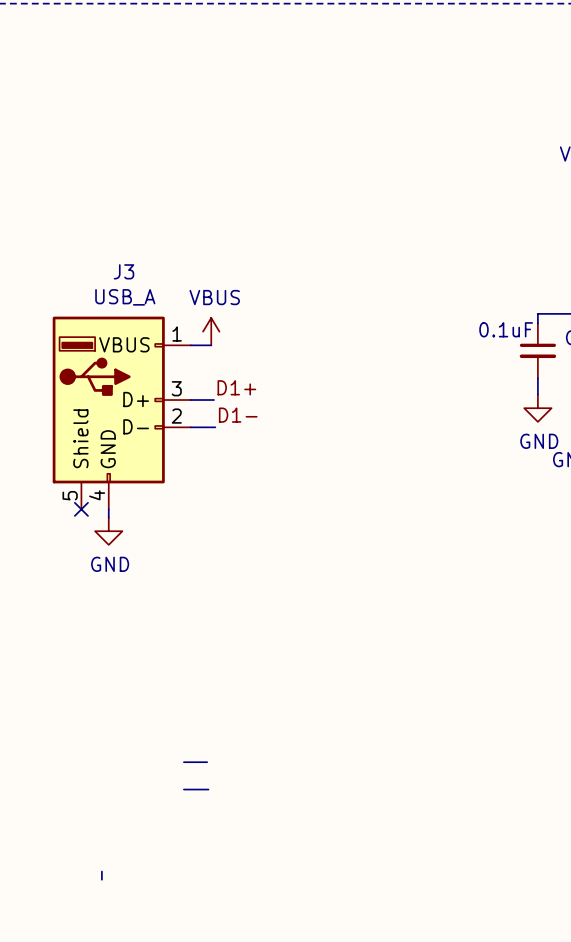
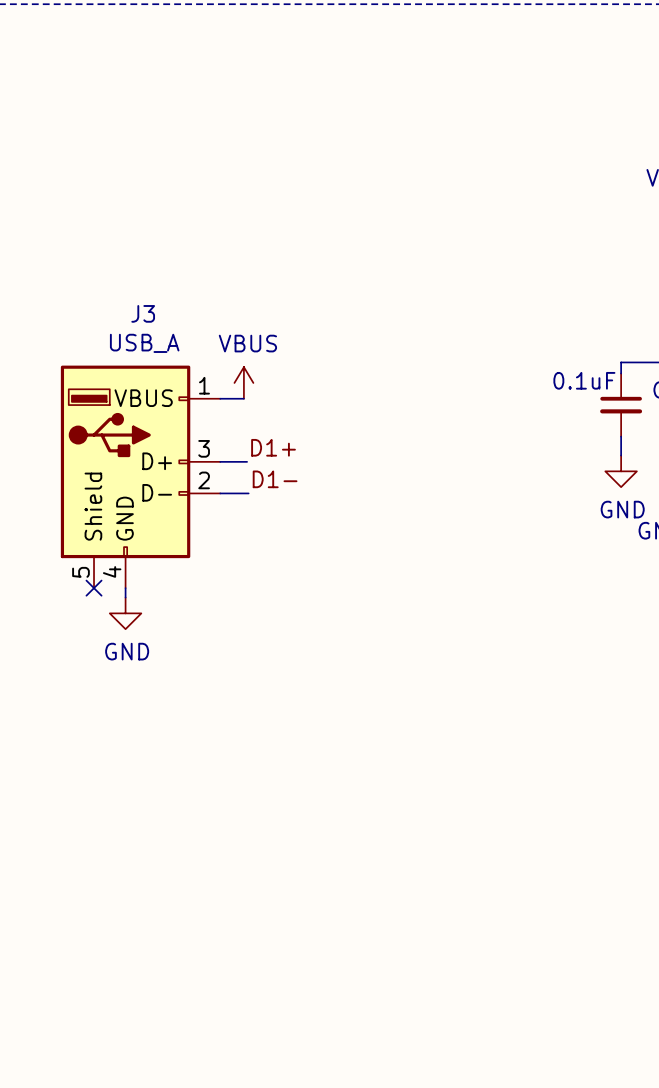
wire: (183, 762) (207, 762) -> none
wire: (183, 789) (208, 789) -> none
wire: (101, 871) (101, 879) -> none

